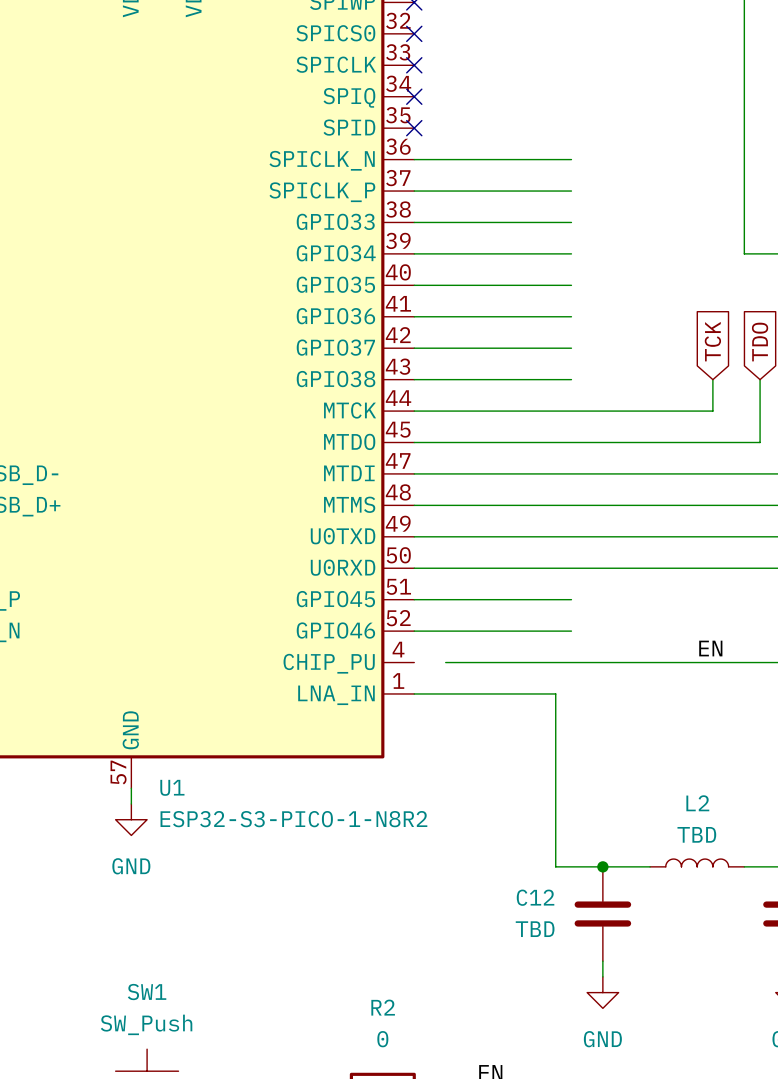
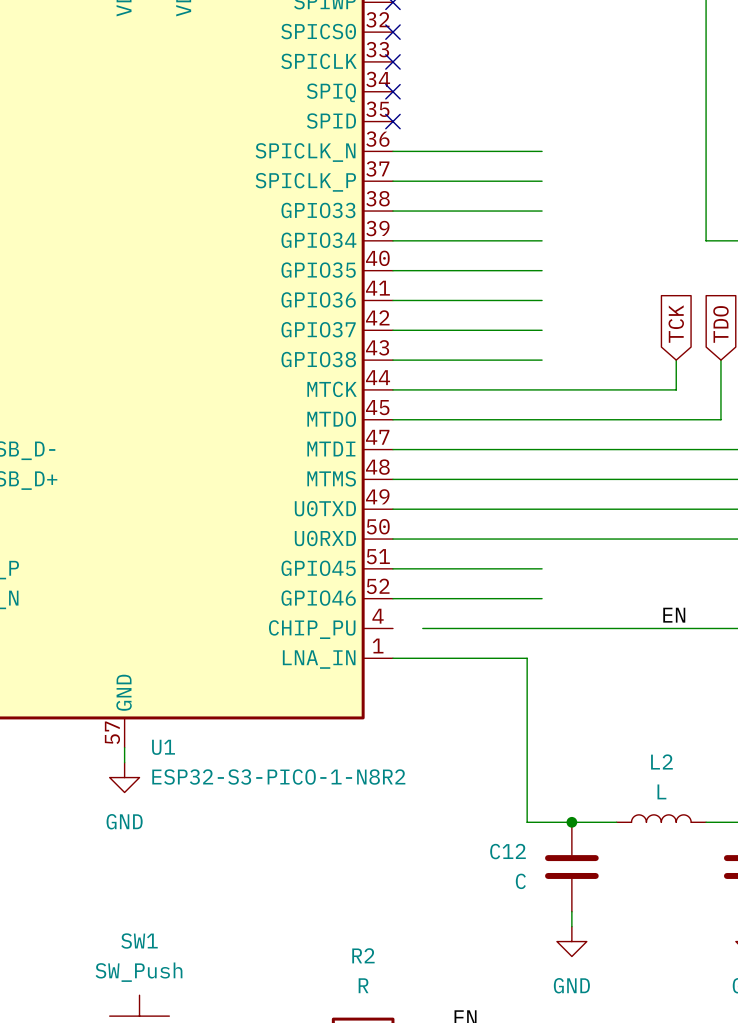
L2 value: TBD (696, 834) -> L (661, 791)
C12 value: TBD (535, 929) -> C (520, 881)
R2 value: 0 (382, 1039) -> R (363, 985)

